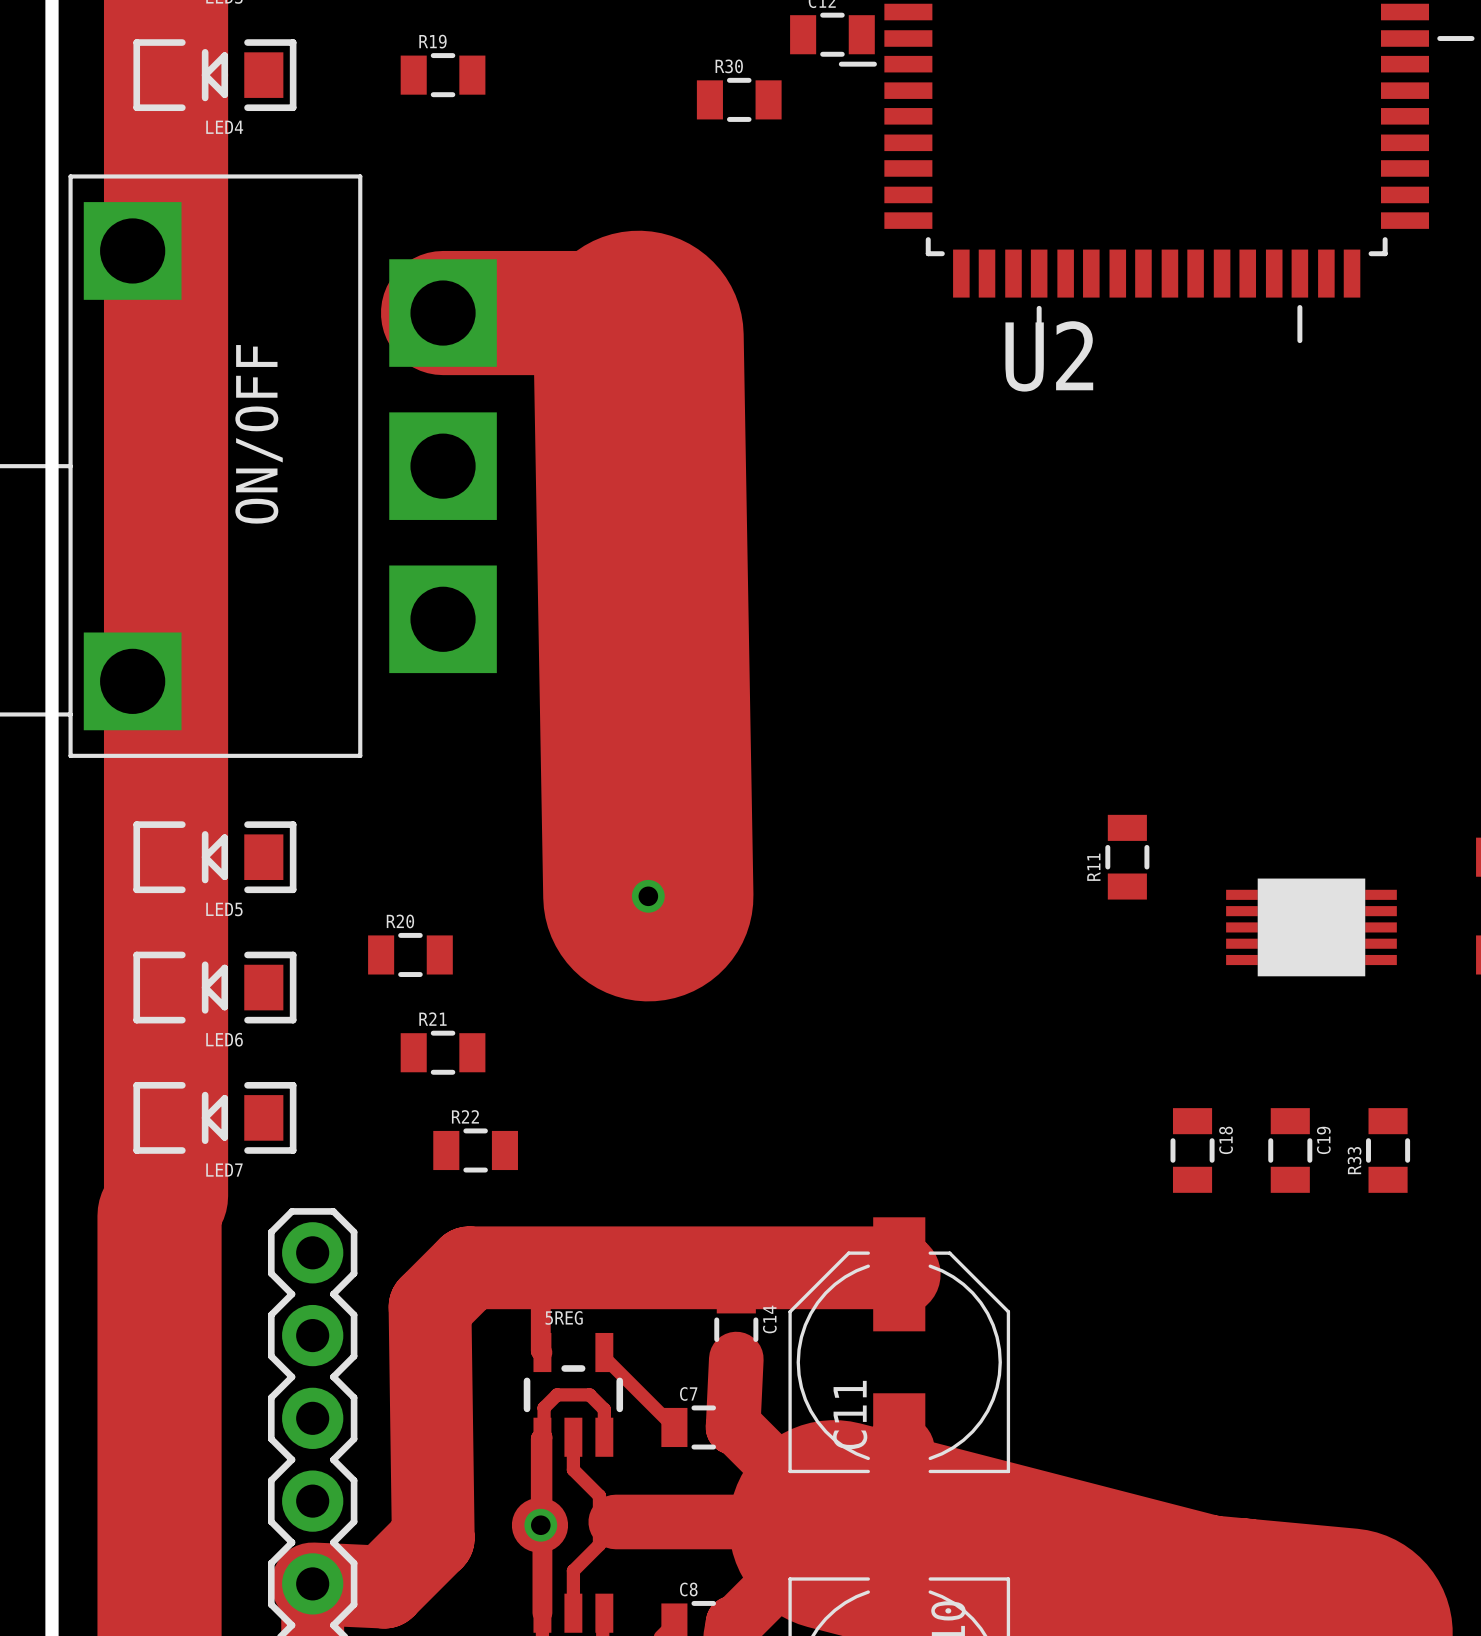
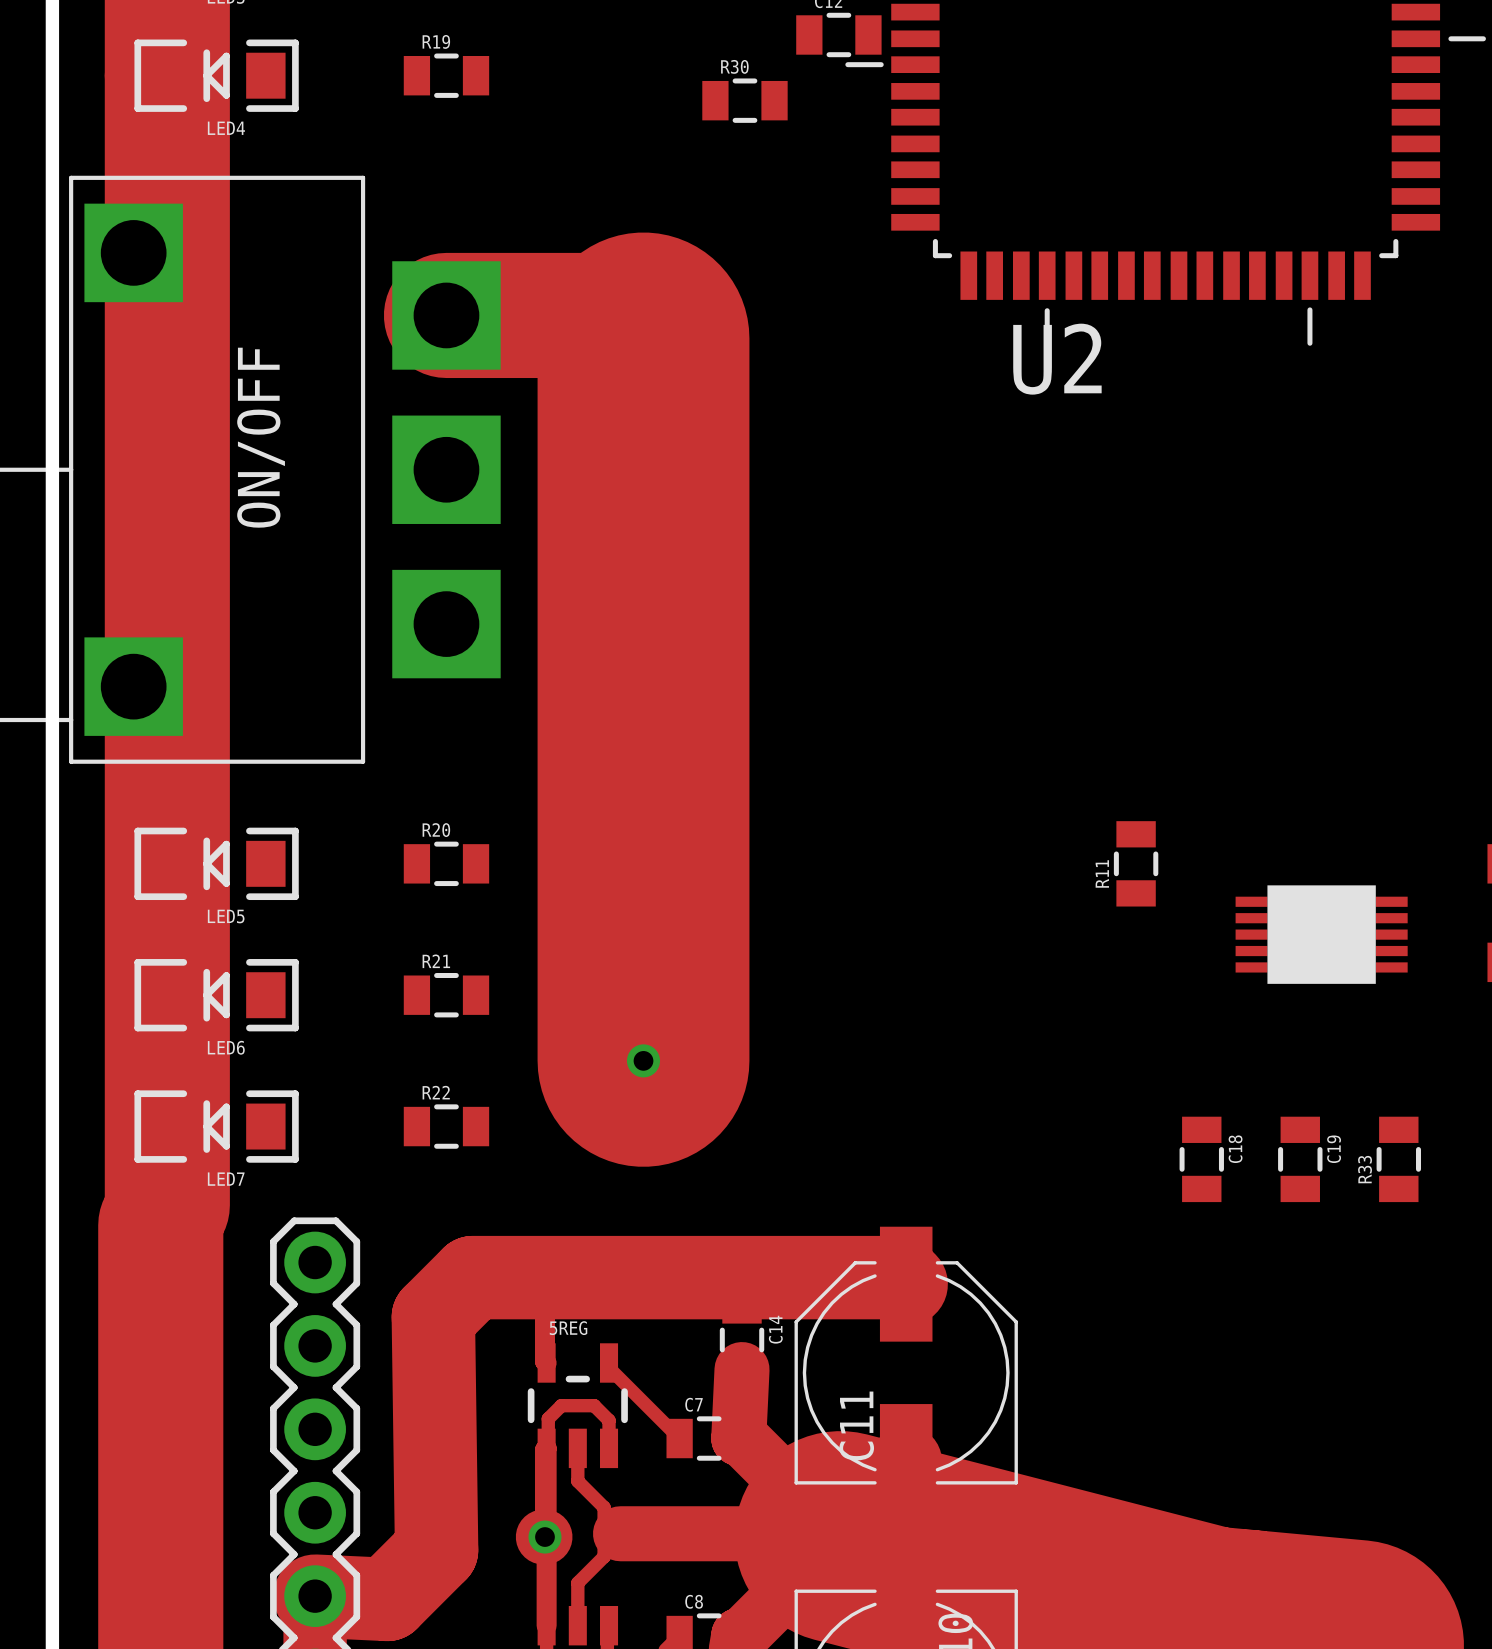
track: (638, 335) (648, 896) -> (643, 338) (643, 1060)
via position: (648, 896) -> (643, 1060)
R20 position: (410, 954) -> (446, 863)
R21 position: (443, 1052) -> (446, 995)
R22 position: (475, 1150) -> (446, 1126)

